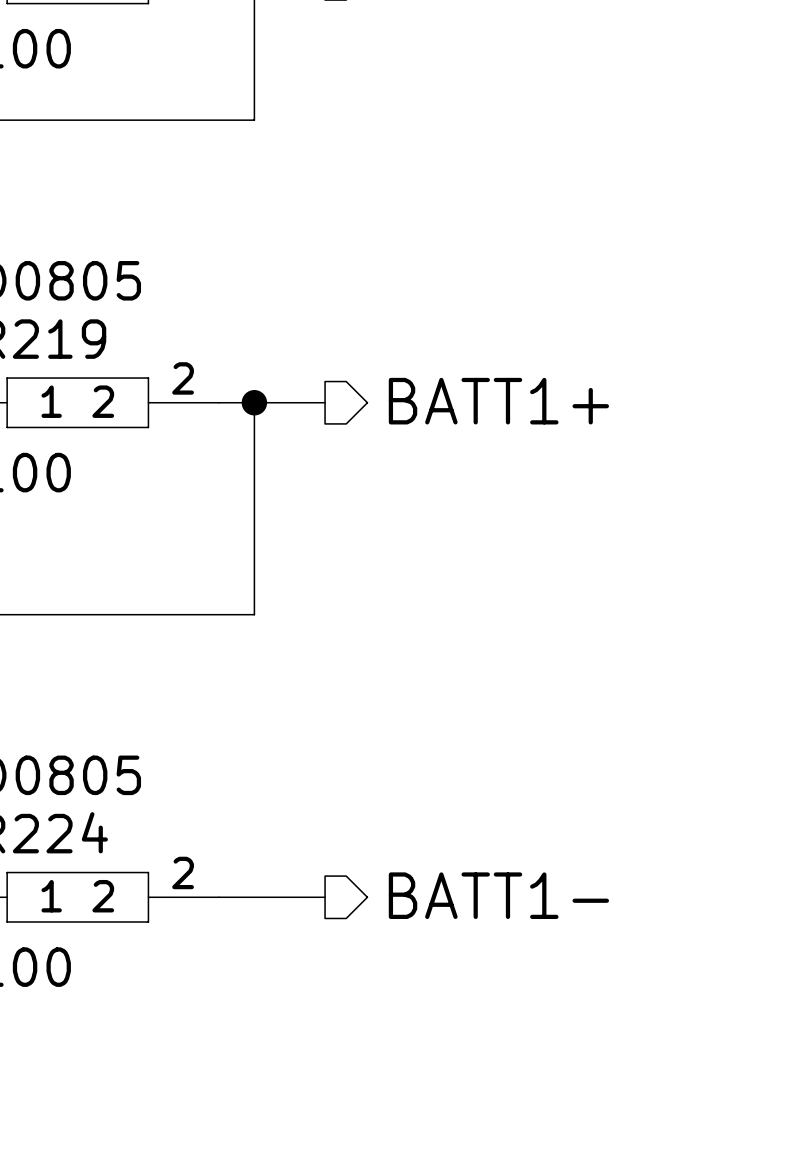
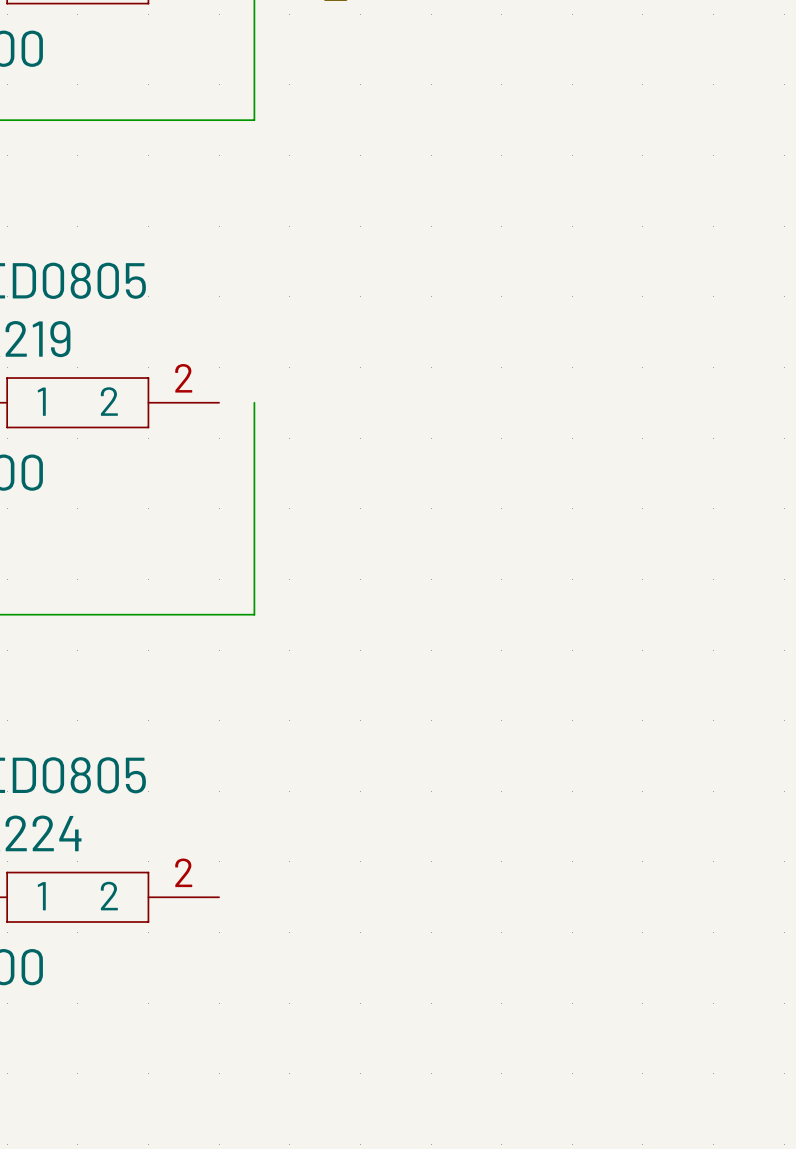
hierarchical label: BATT1+ (498, 401) -> none
wire: (219, 402) (325, 402) -> none
junction: (254, 402) -> none
hierarchical label: BATT1- (498, 895) -> none
wire: (219, 897) (325, 897) -> none

